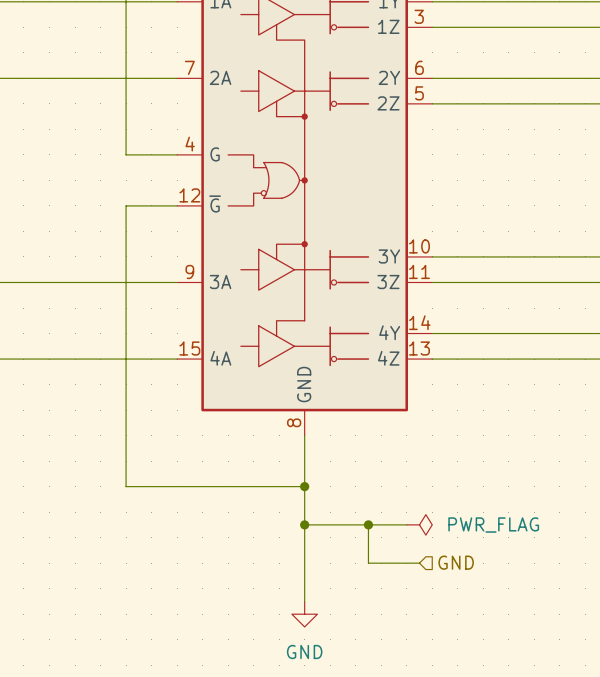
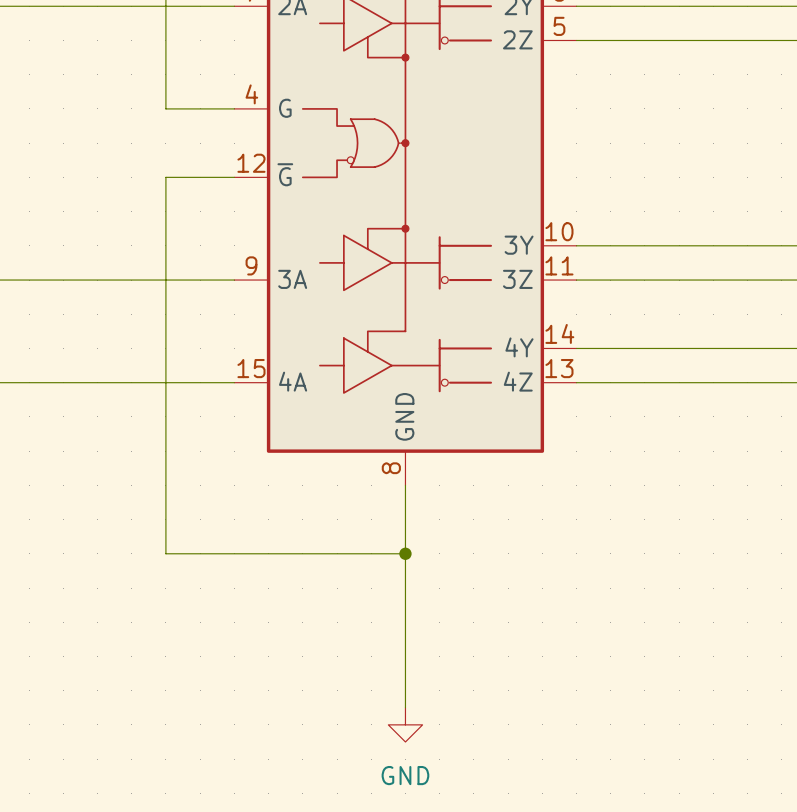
wire: (304, 524) (406, 524) -> none
junction: (304, 524) -> none
wire: (368, 524) (368, 563) (419, 563) -> none
junction: (368, 524) -> none
power symbol: PWR_FLAG (419, 524) -> none
hierarchical label: GND (456, 562) -> none

